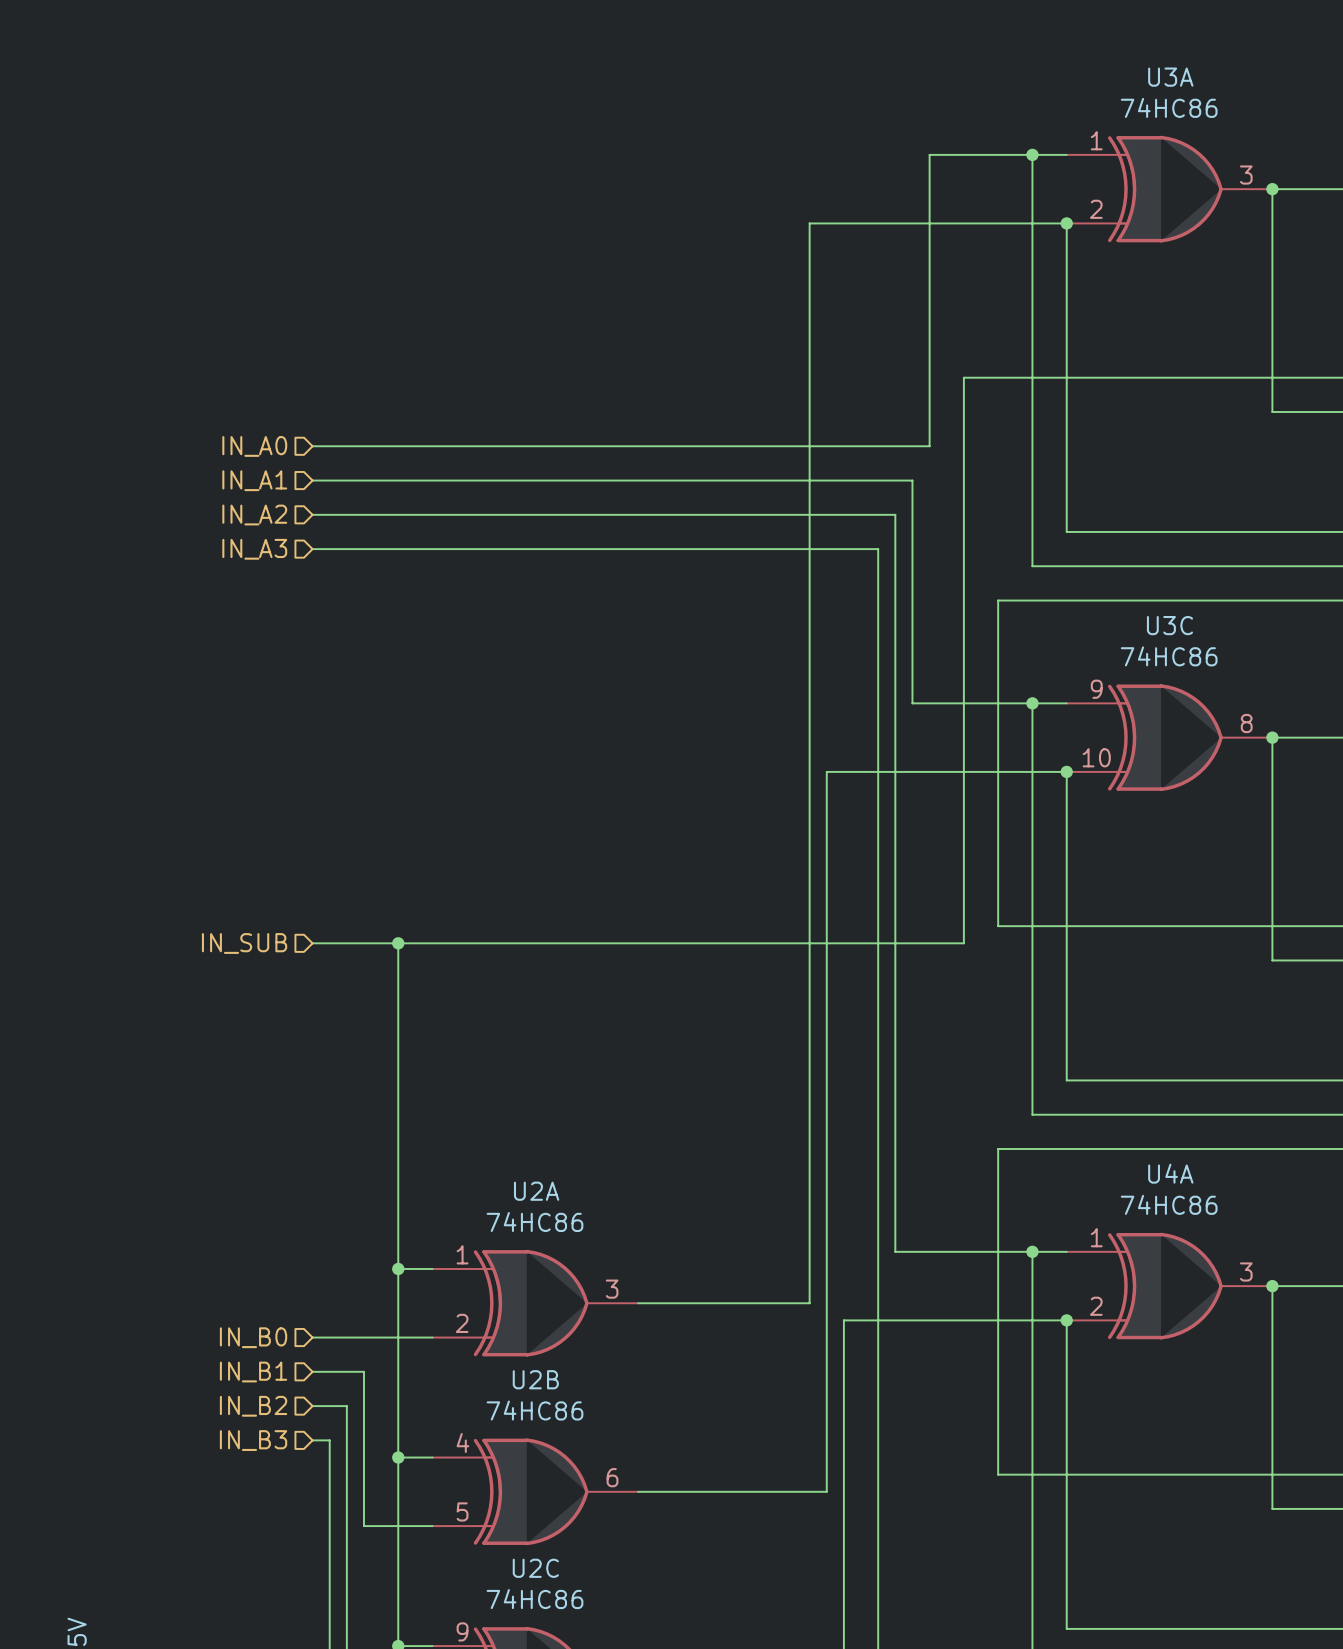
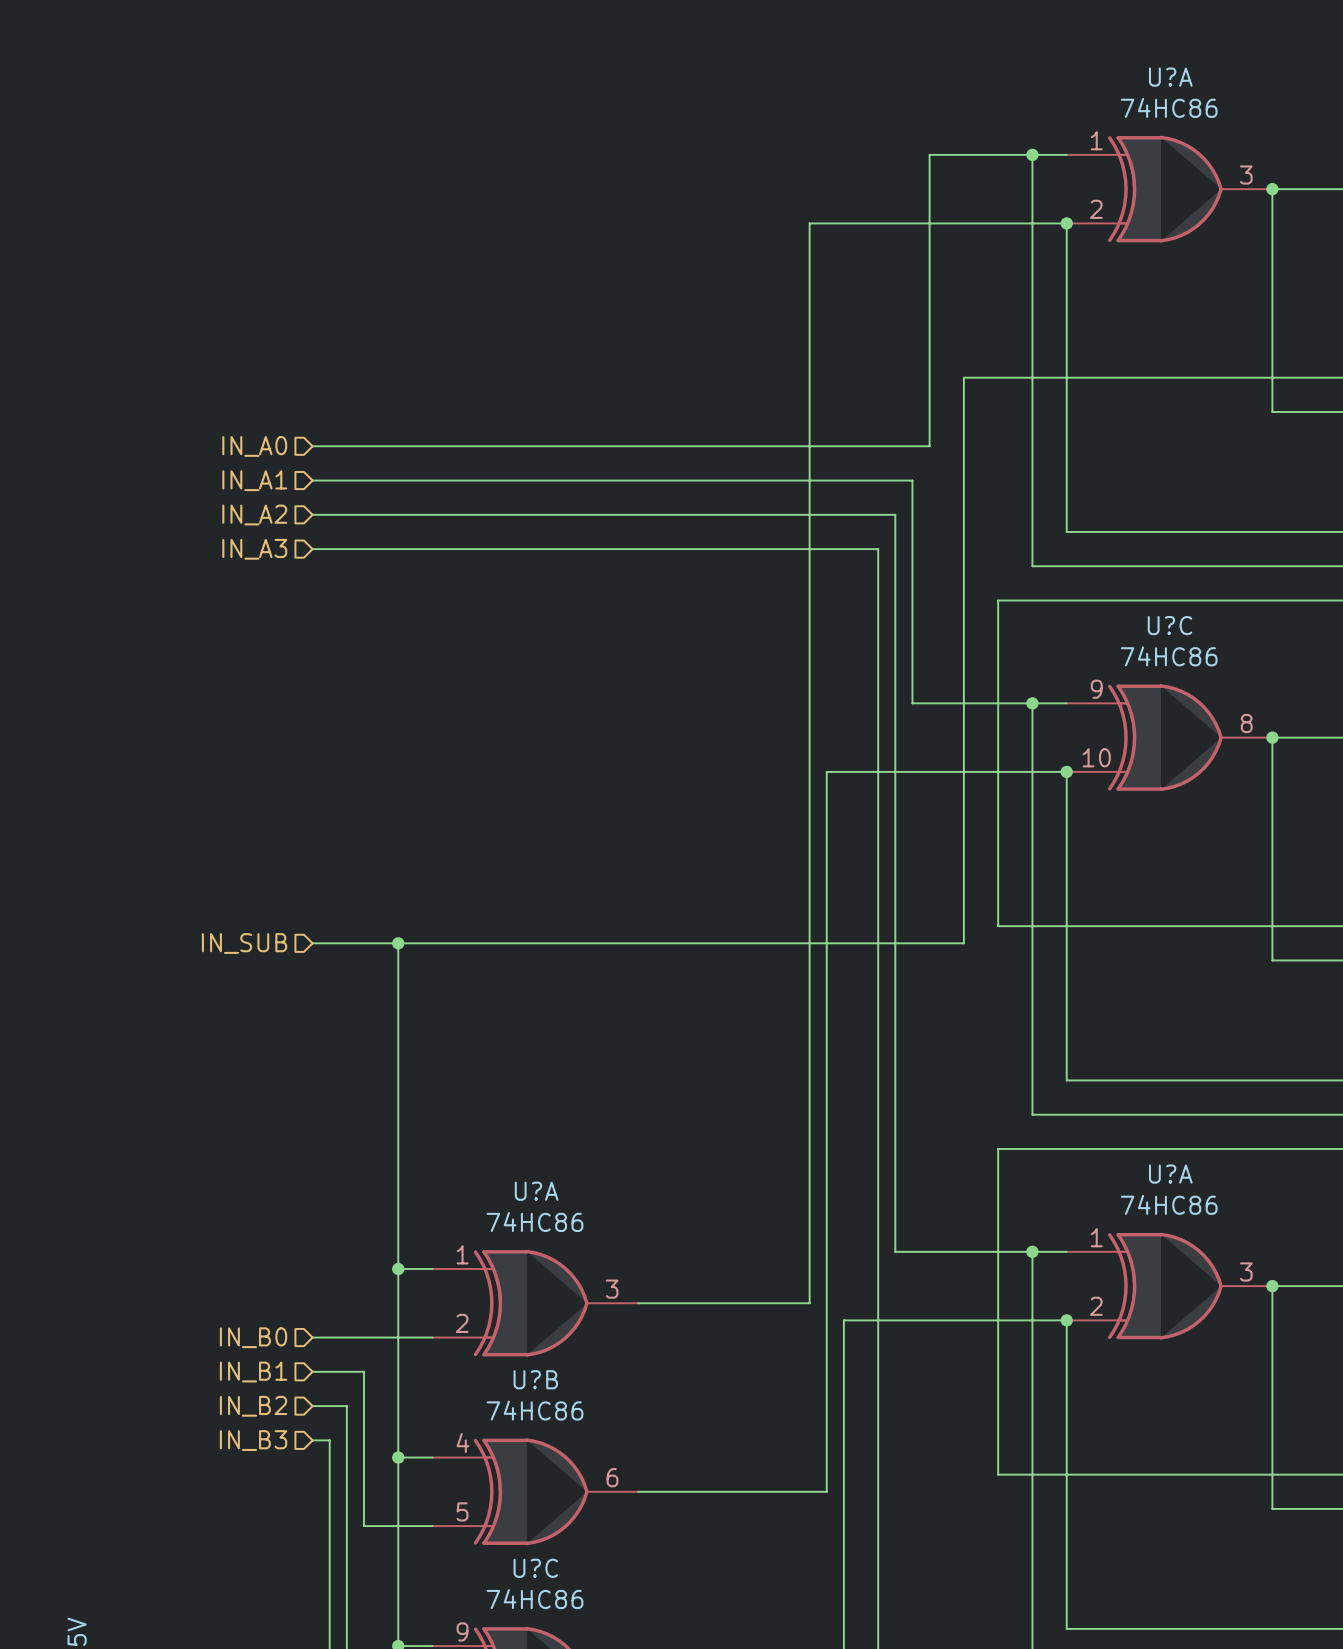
U3A name: U3A (1170, 77) -> U?A (1170, 77)
U3C name: U3C (1169, 625) -> U?C (1169, 625)
U4A name: U4A (1170, 1173) -> U?A (1170, 1174)
U2A name: U2A (536, 1191) -> U?A (536, 1191)
U2B name: U2B (535, 1379) -> U?B (535, 1379)
U2C name: U2C (535, 1568) -> U?C (535, 1568)

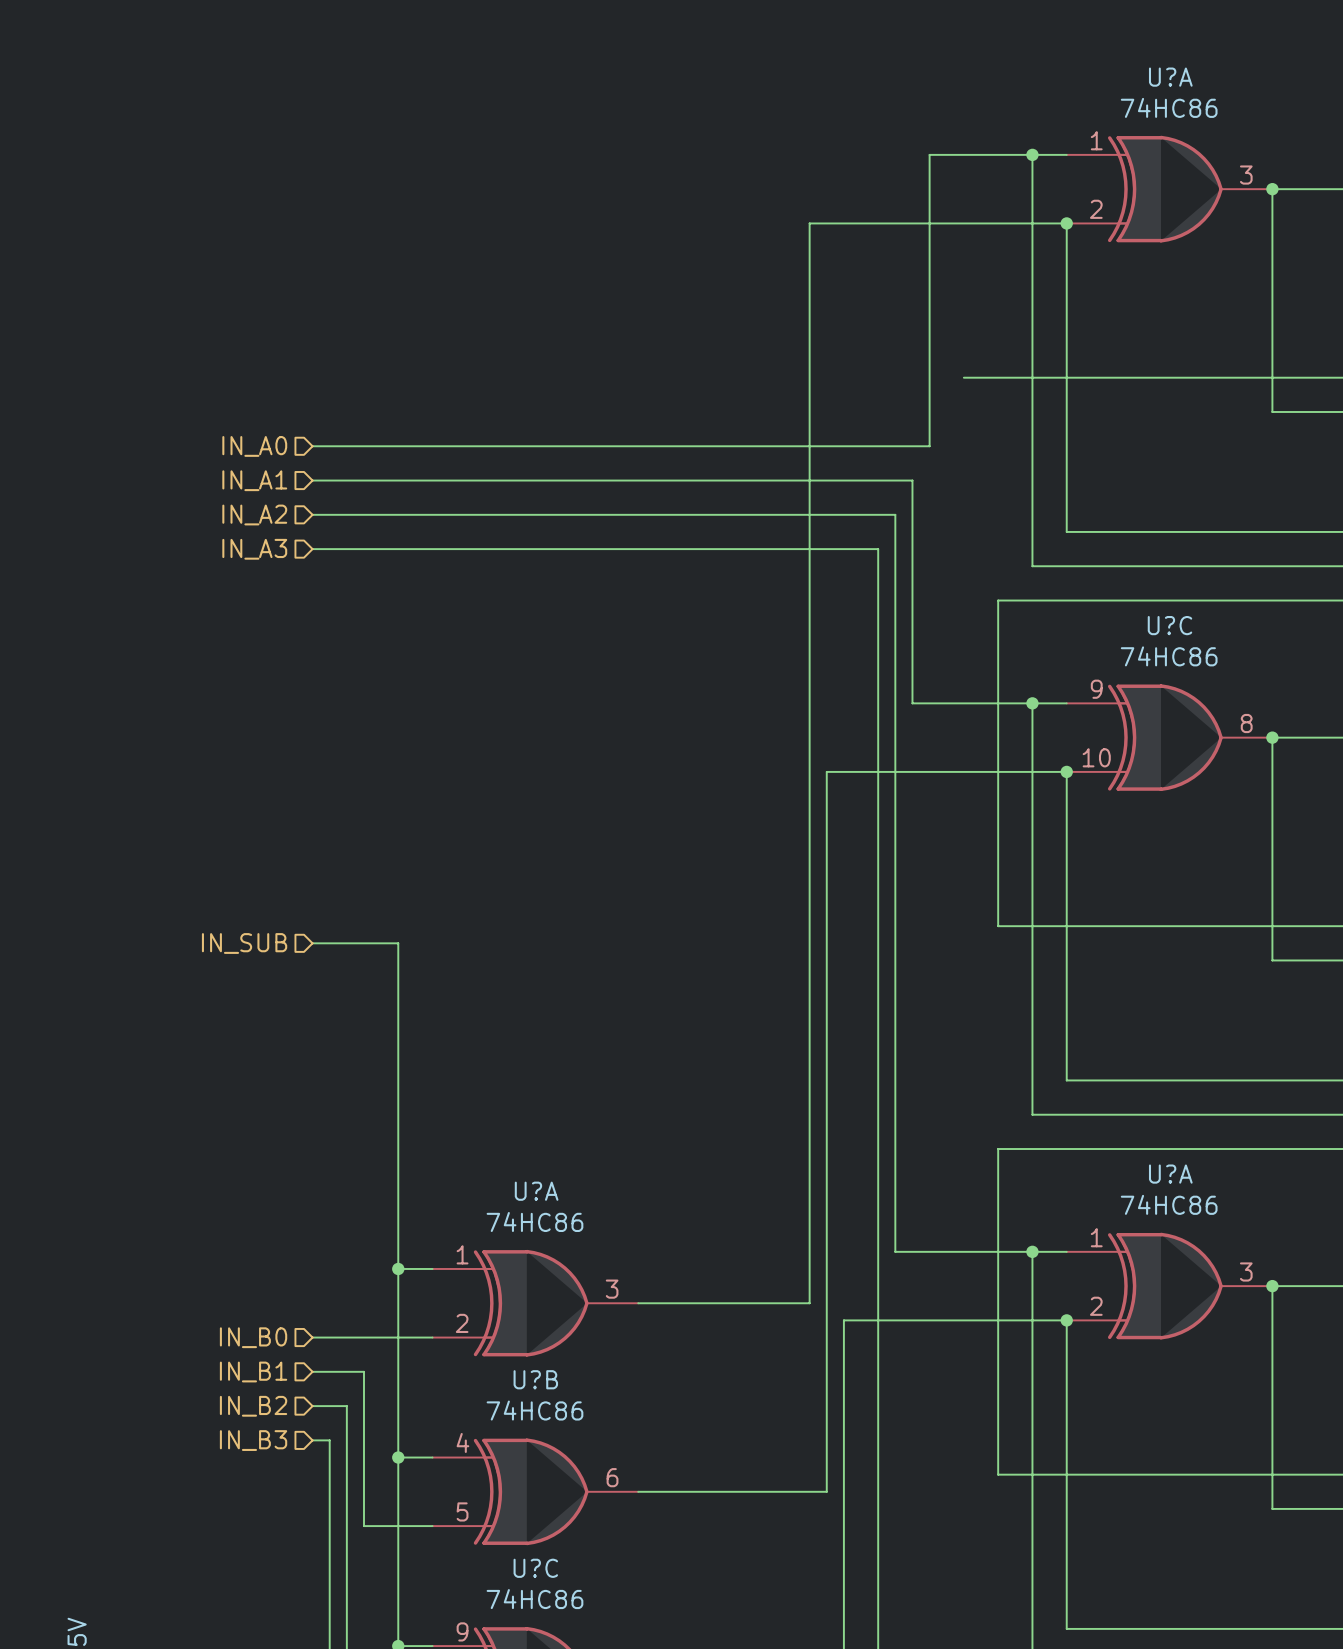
wire: (963, 377) (963, 943) (398, 943) -> none
junction: (398, 943) -> none

